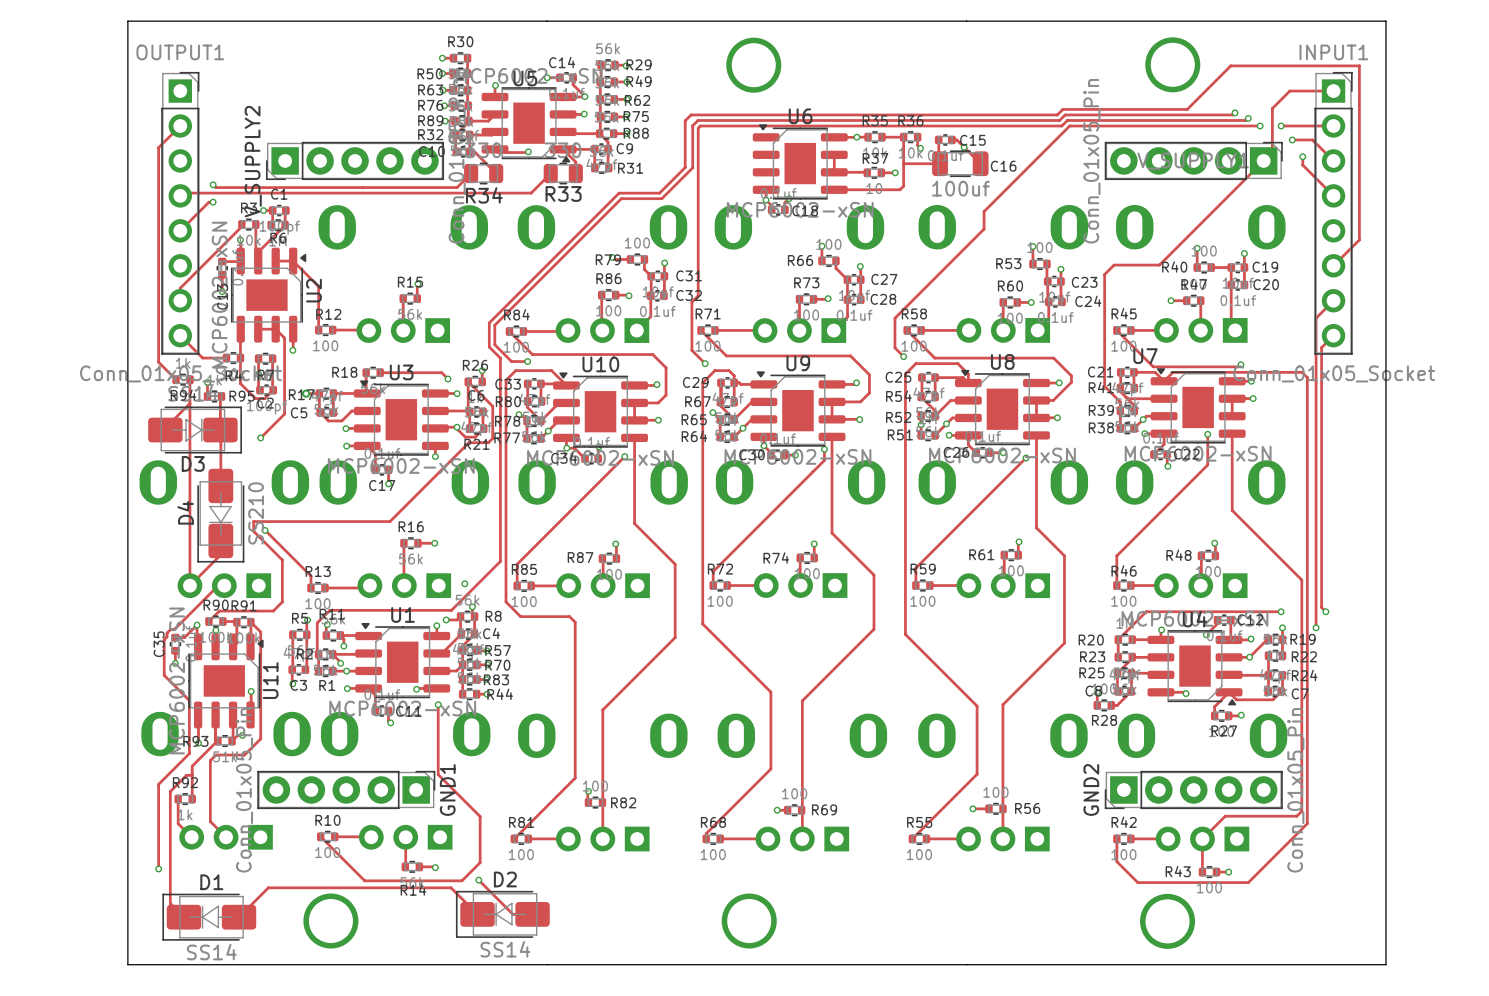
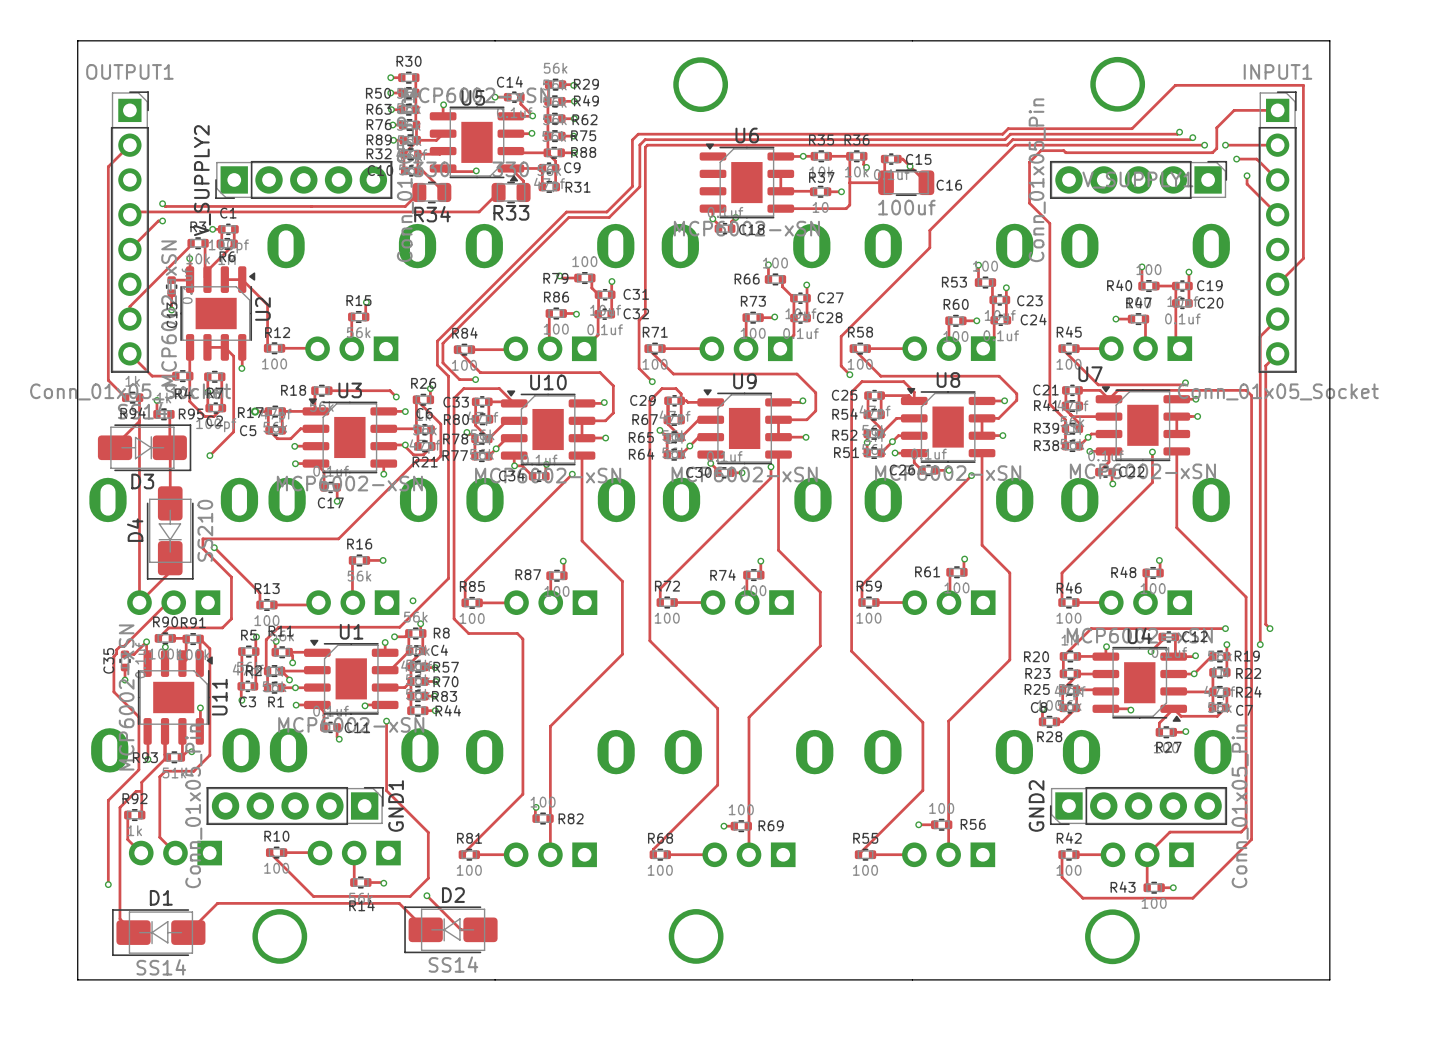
track: (1272, 129) (1272, 152) (1159, 265) (1114, 265) (1104, 274) -> (1216, 148) (1212, 152) (1065, 152) (1063, 150) (1041, 150) (1029, 162) (1029, 203) (1049, 223) (1049, 292)

